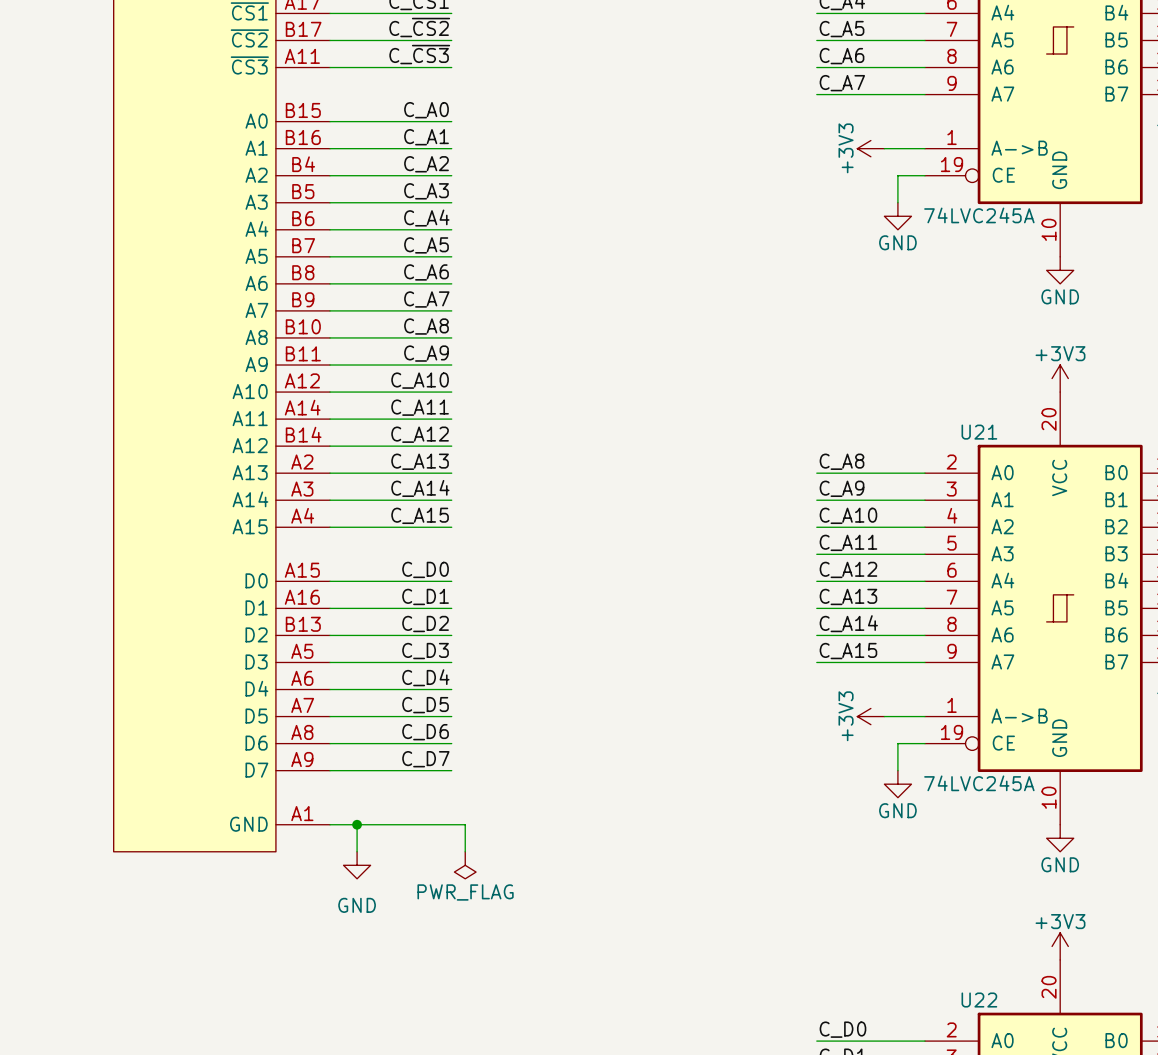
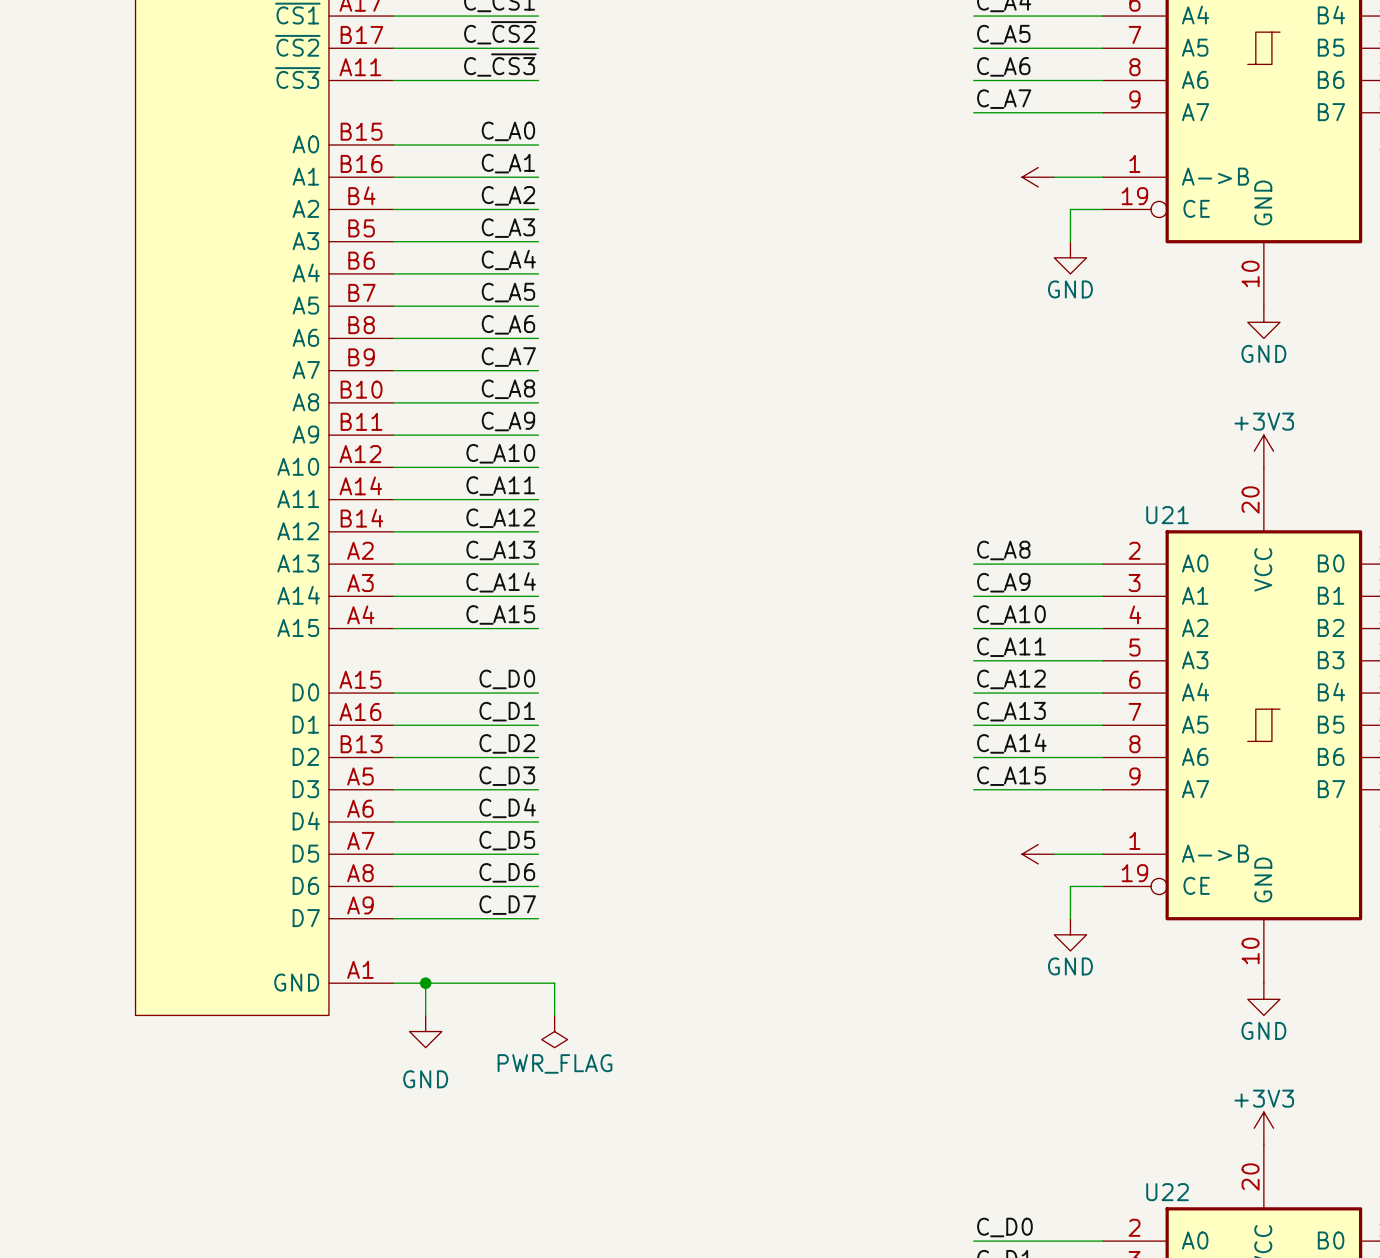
power symbol text: +3V3 (846, 148) -> none
part value: 74LVC245A (979, 215) -> none
power symbol text: +3V3 (846, 716) -> none
U21 value: 74LVC245A (979, 783) -> none

